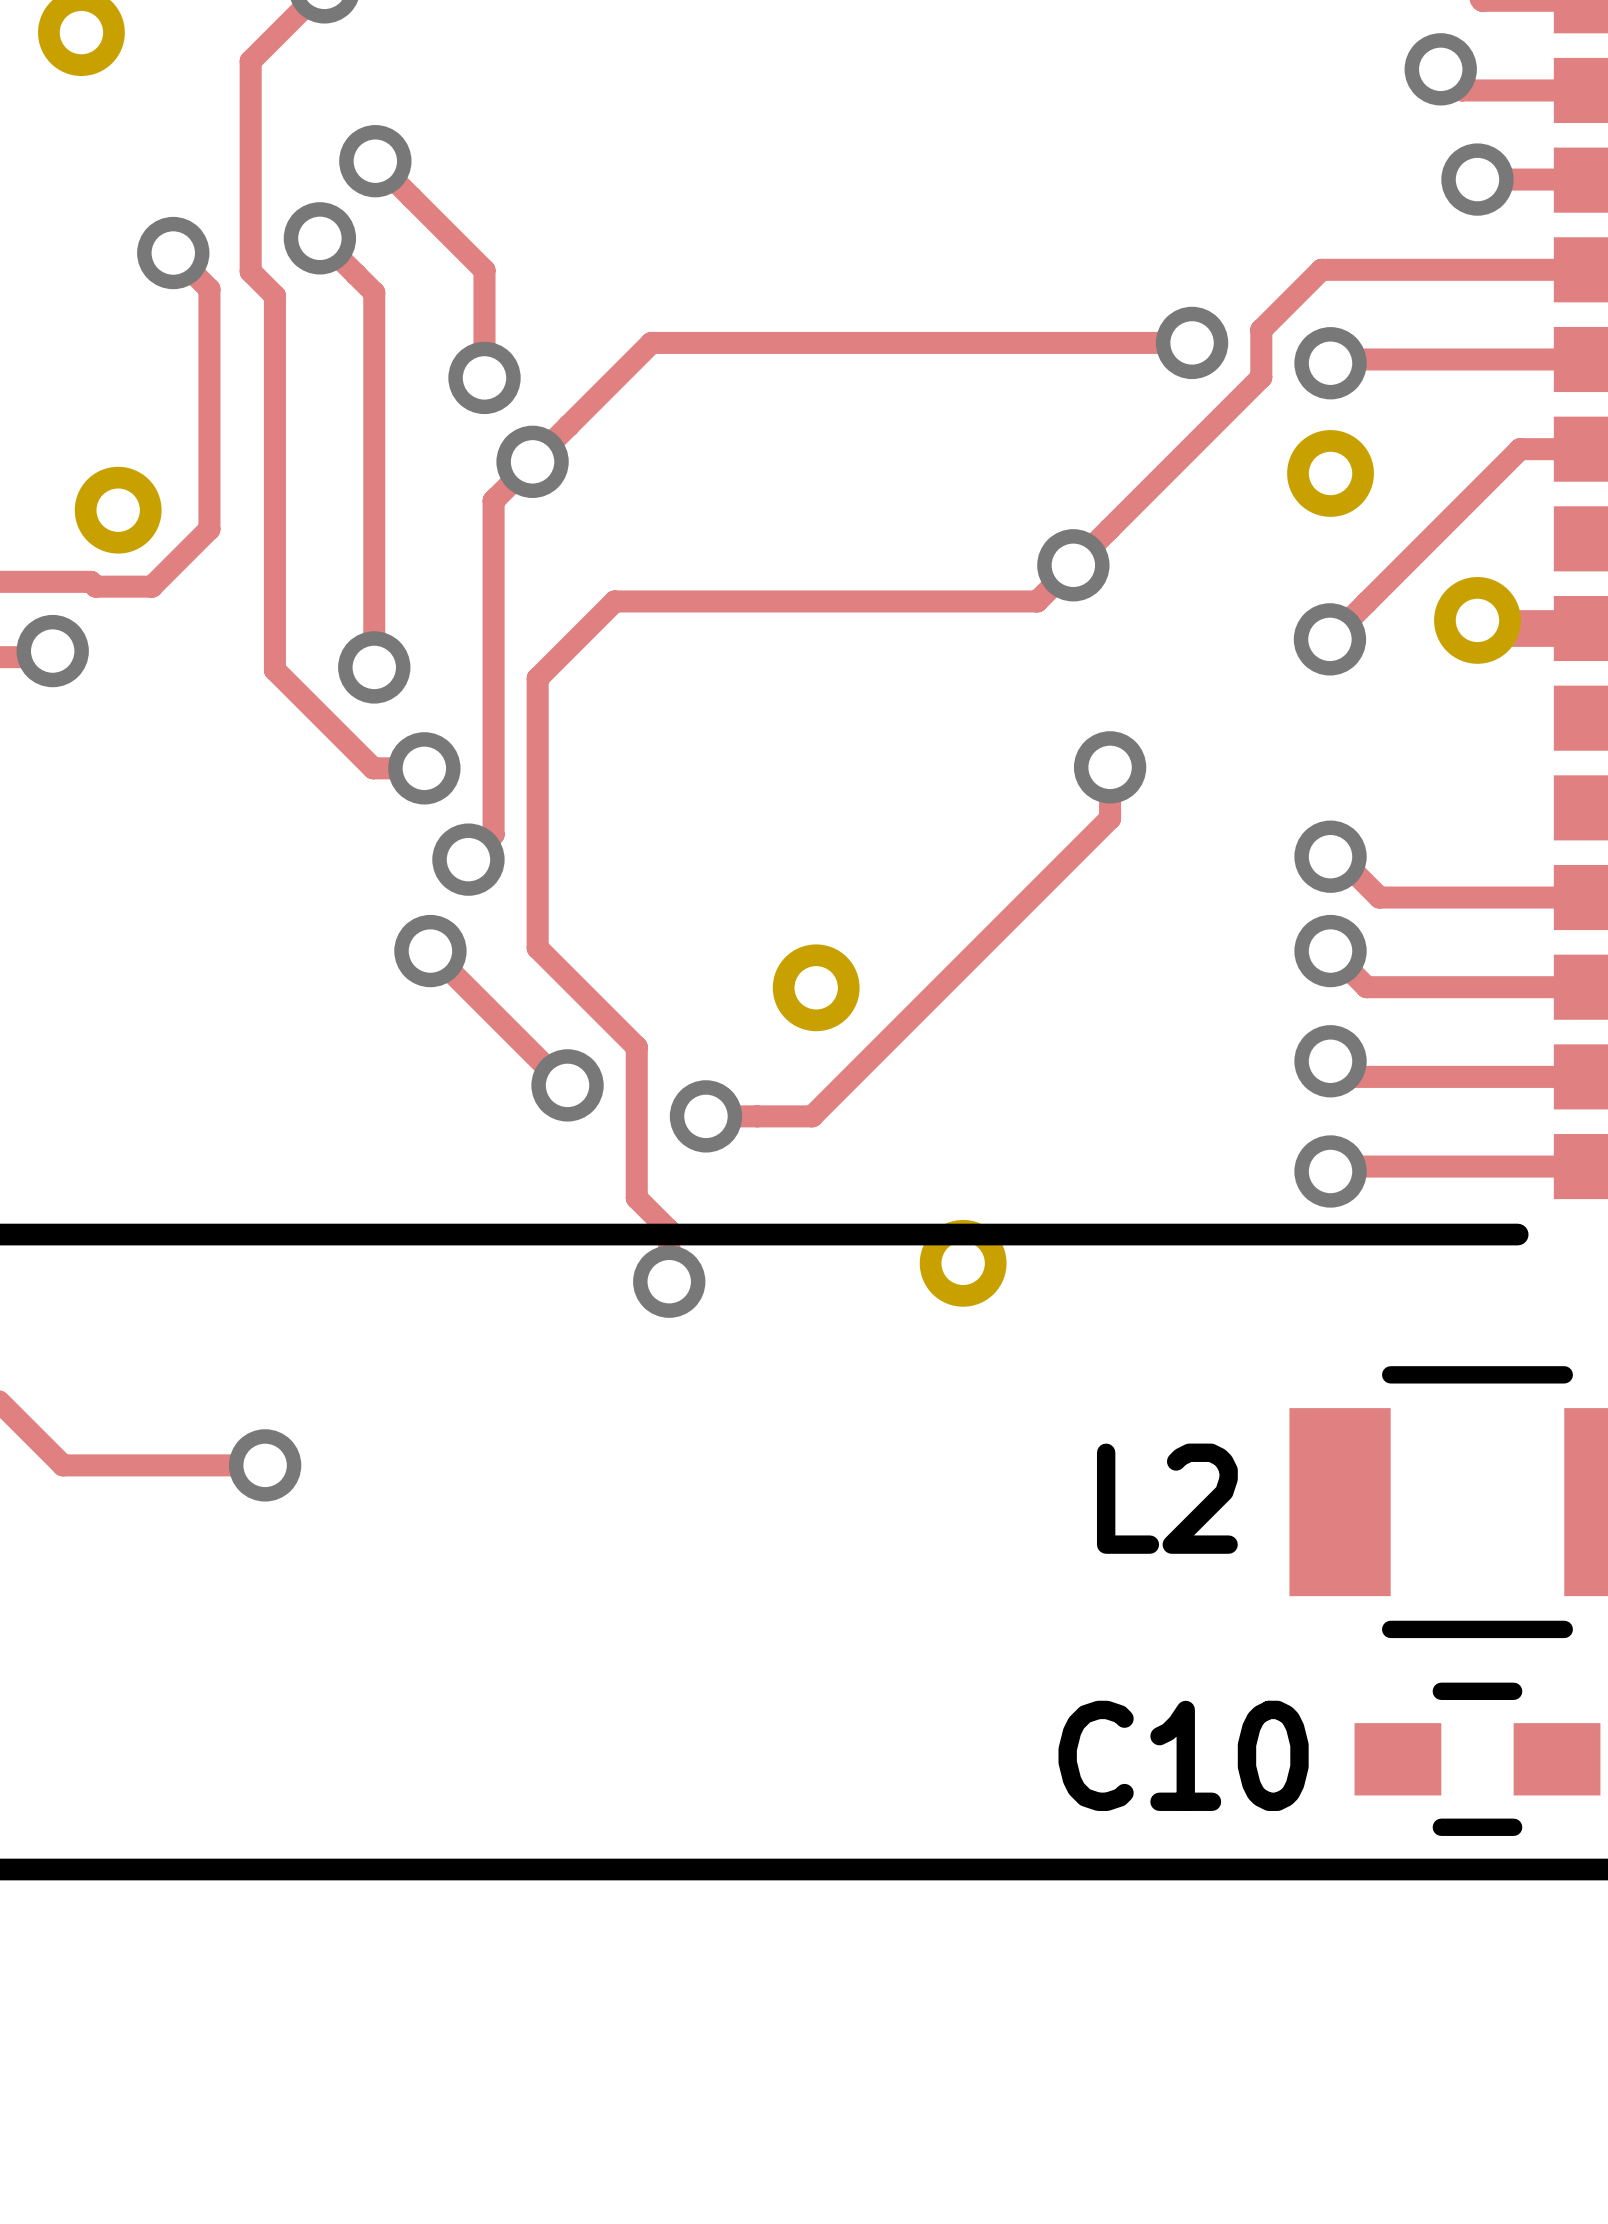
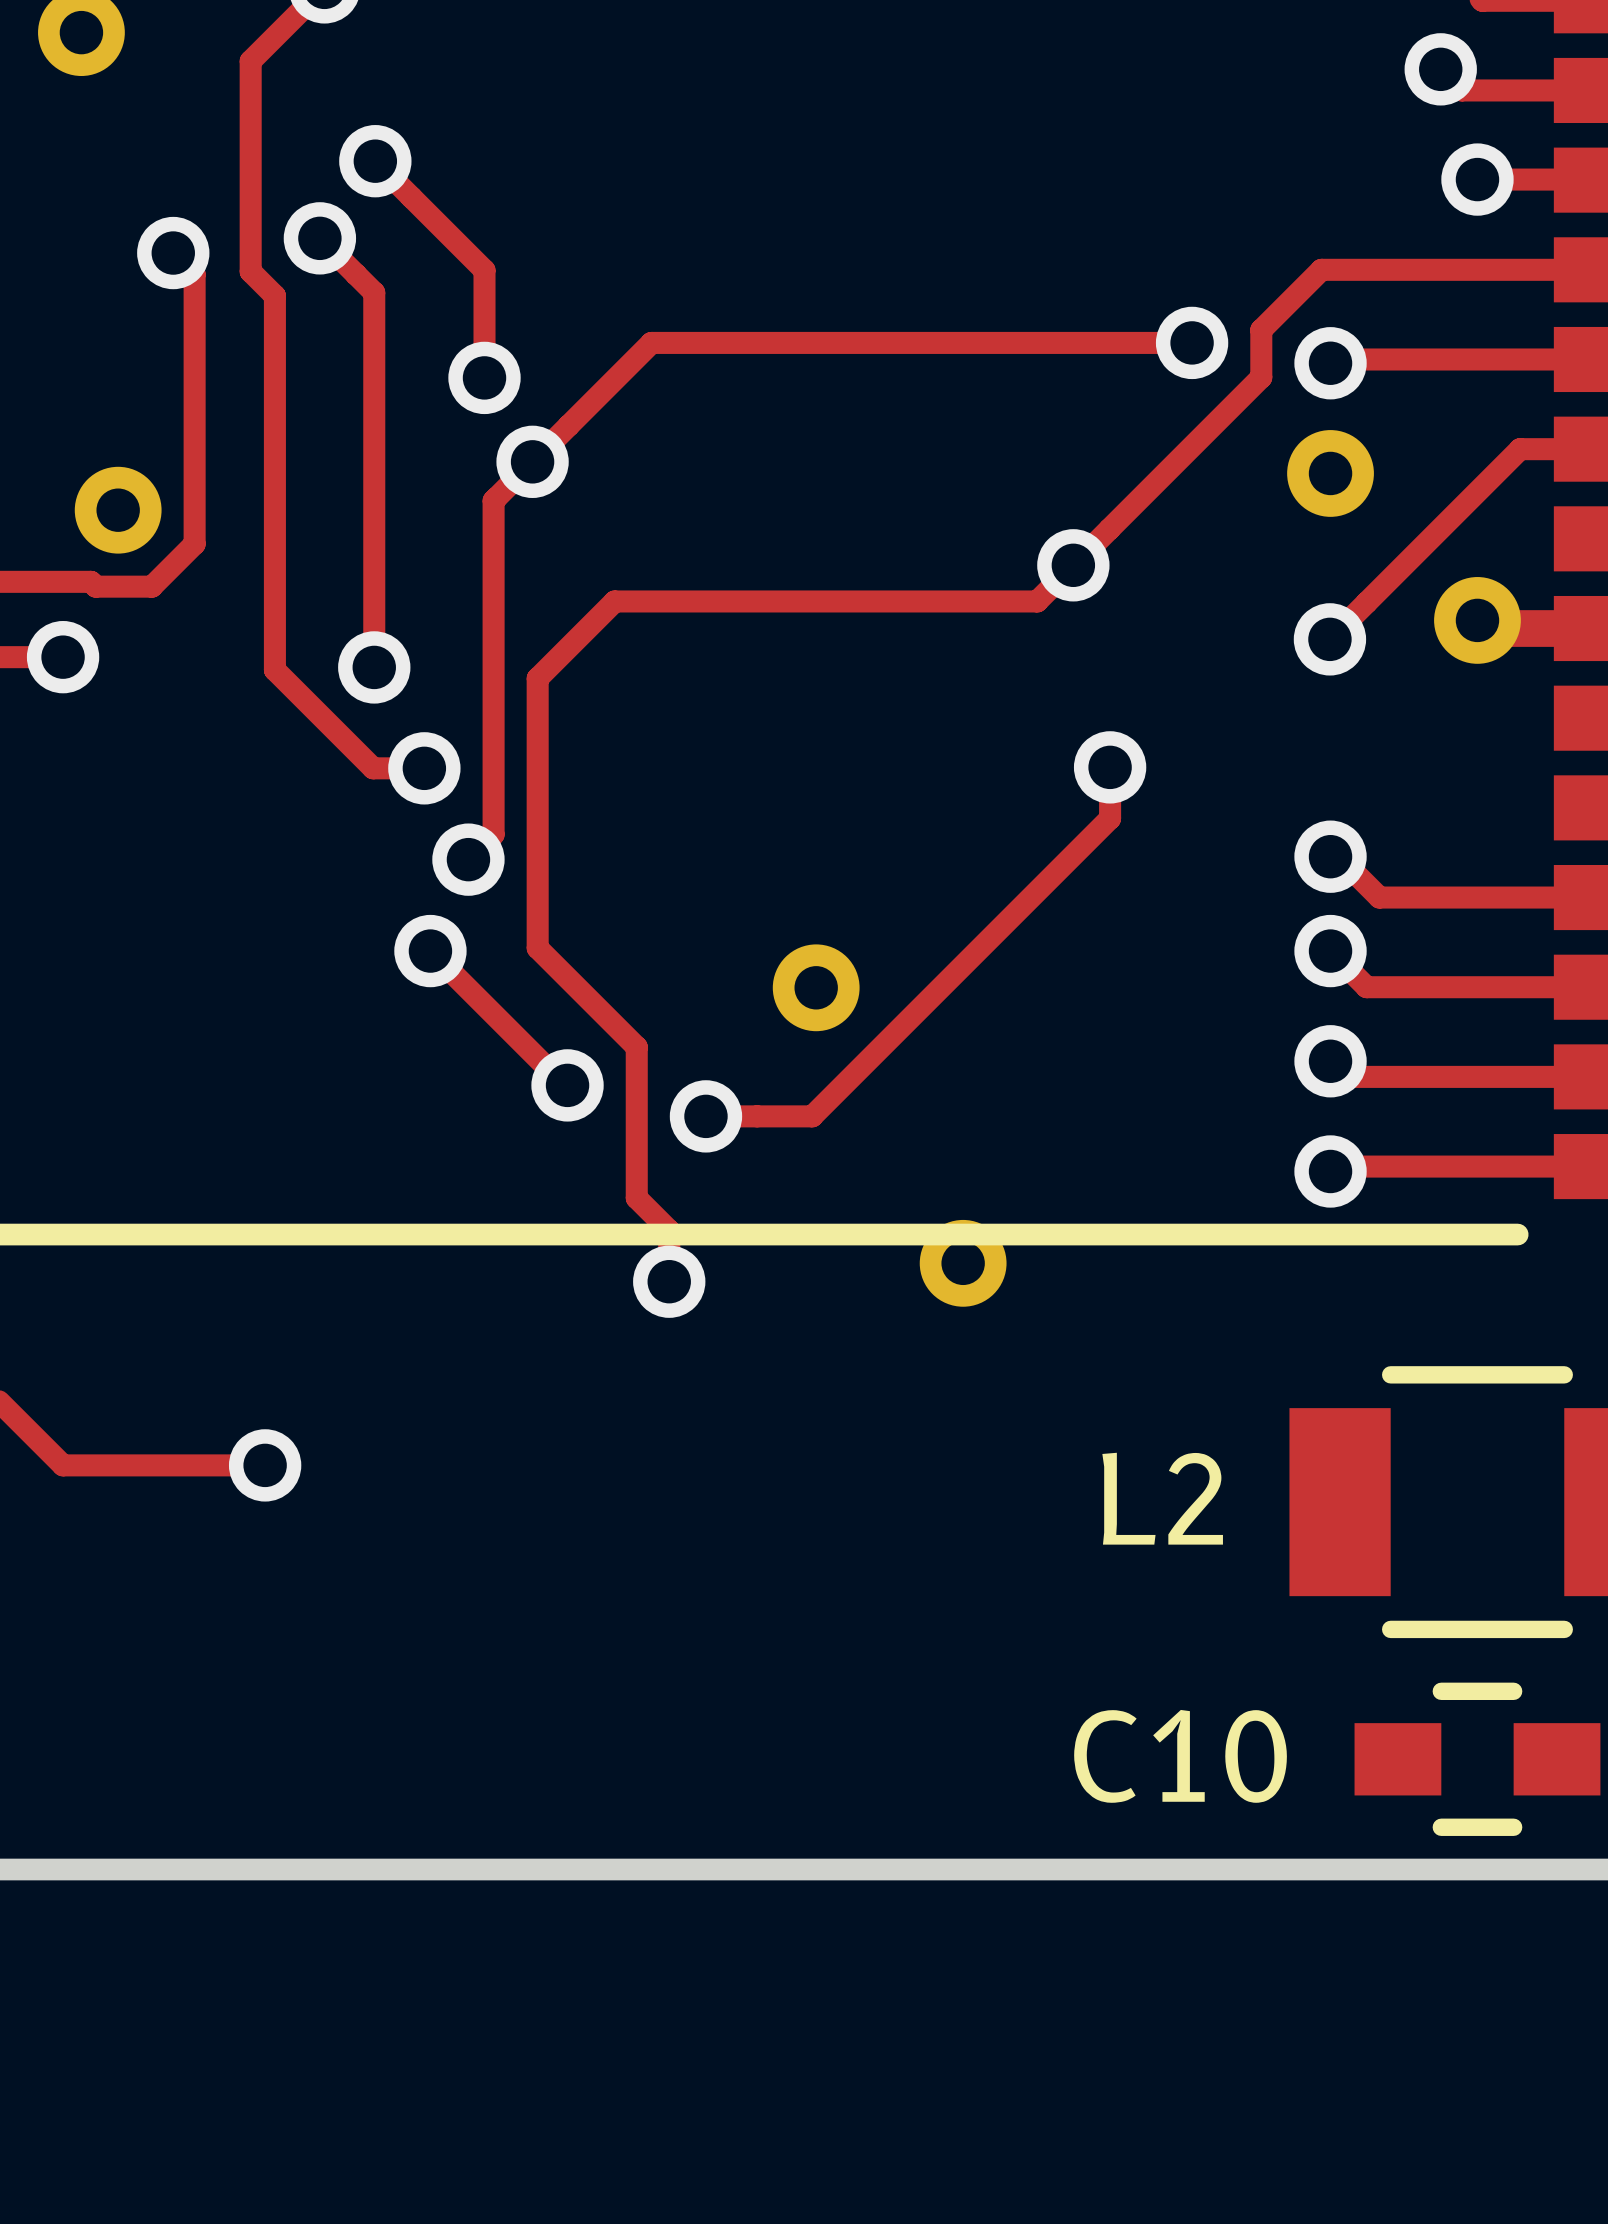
track: (194, 274) (209, 289) (209, 529) (194, 543) -> (194, 274) (194, 543)
via position: (52, 651) -> (63, 657)

